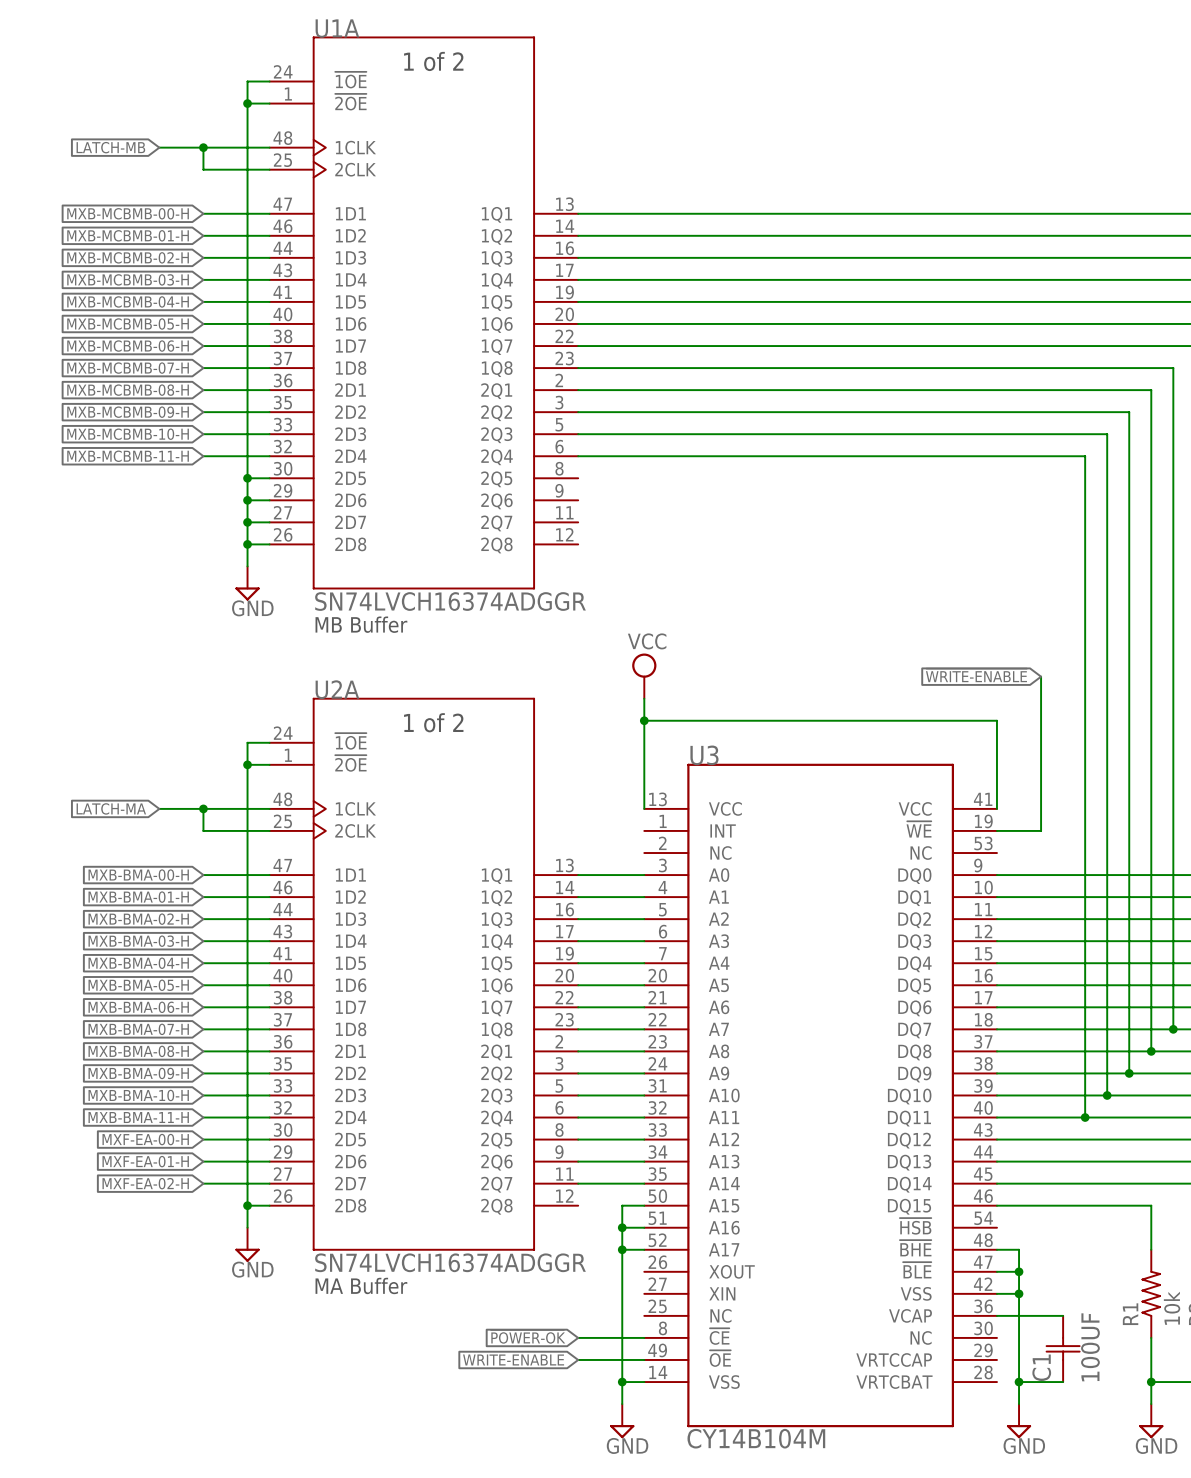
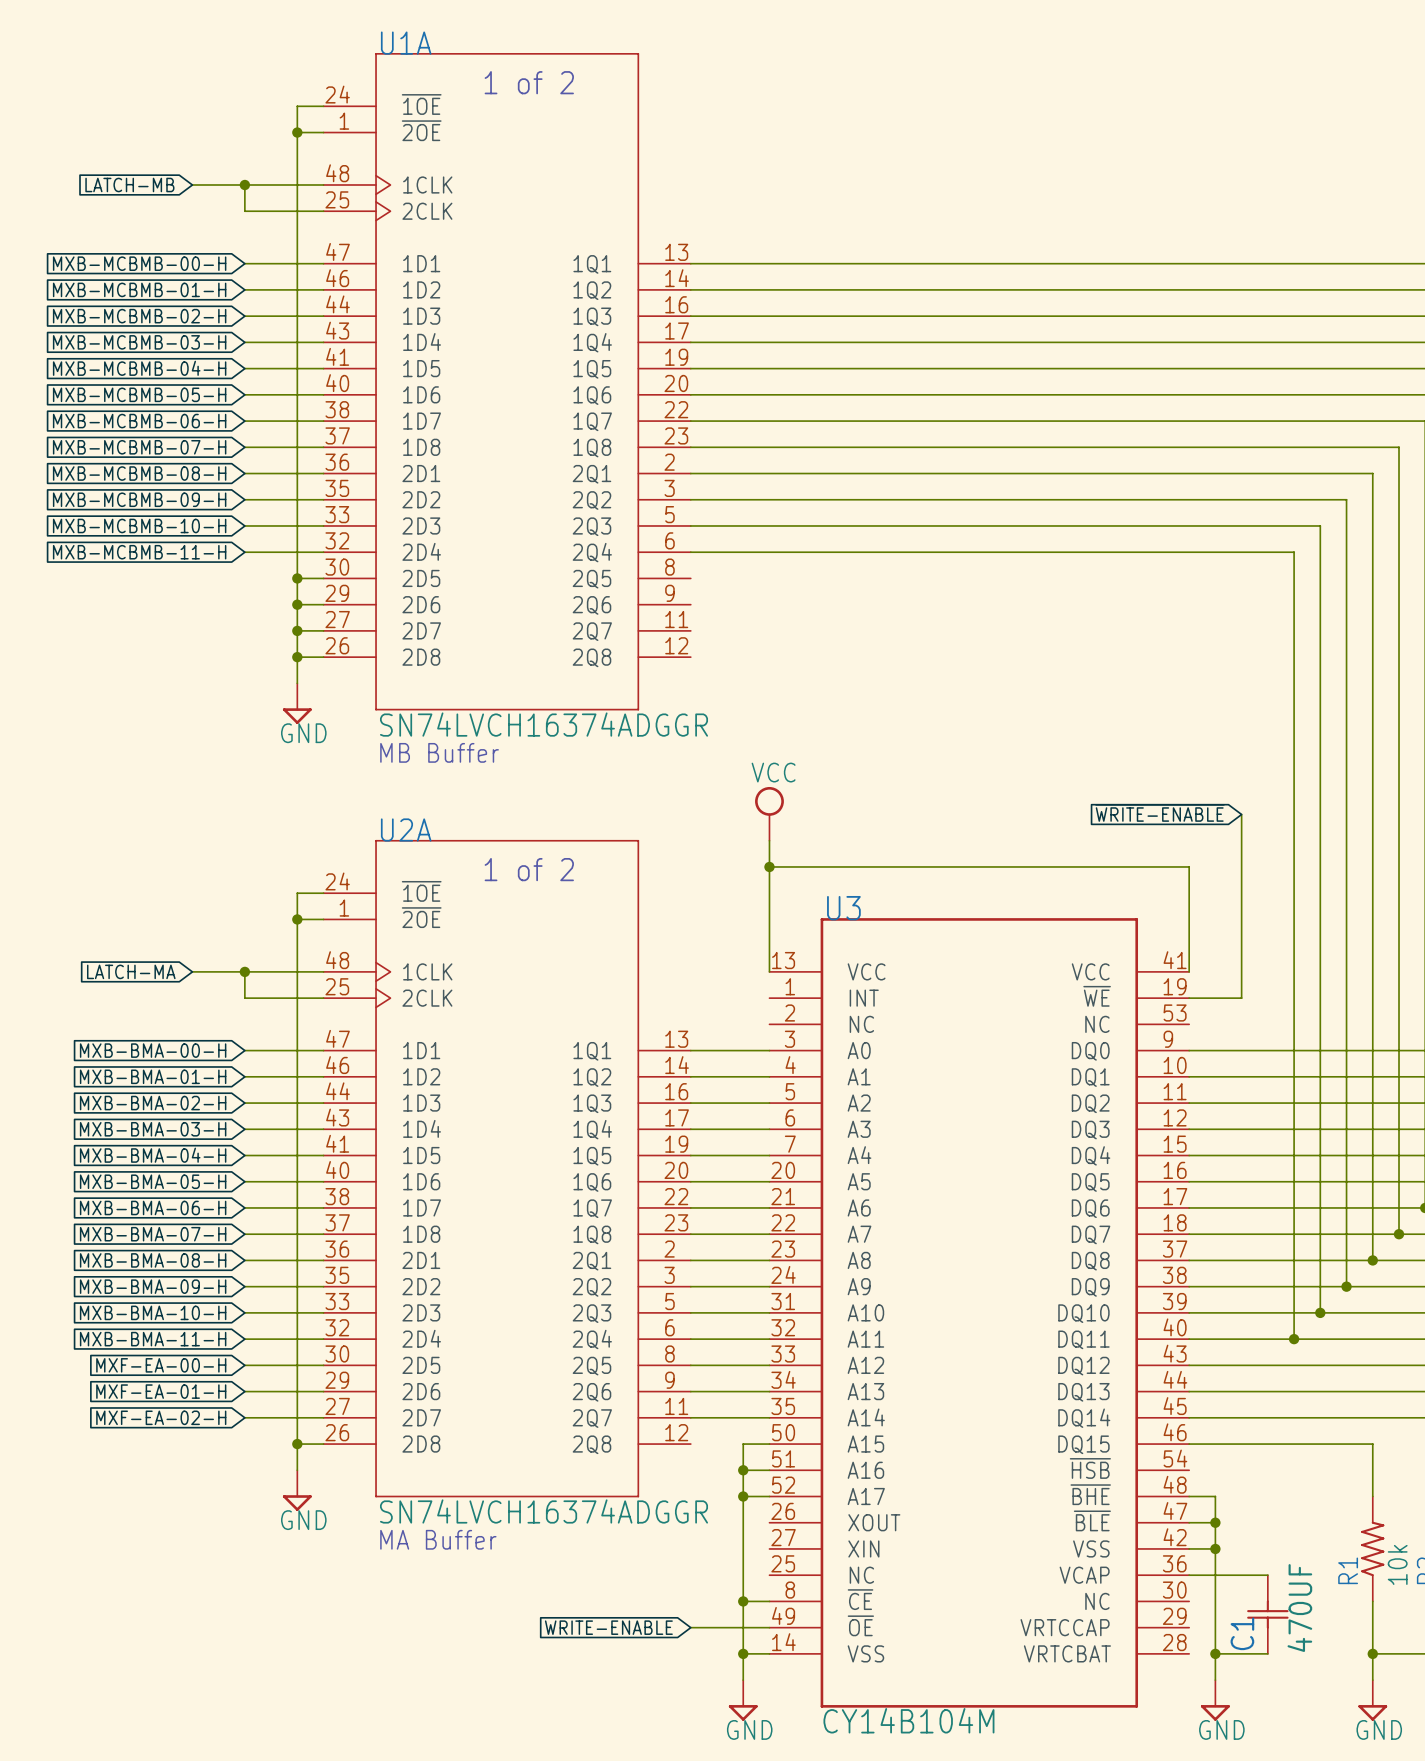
global label: ~{POWER-OK} (528, 1336) -> none
wire: (578, 1337) (622, 1337) -> none
junction: none -> (743, 1601)
C1 value: 100UF (1090, 1347) -> 470UF (1299, 1608)

